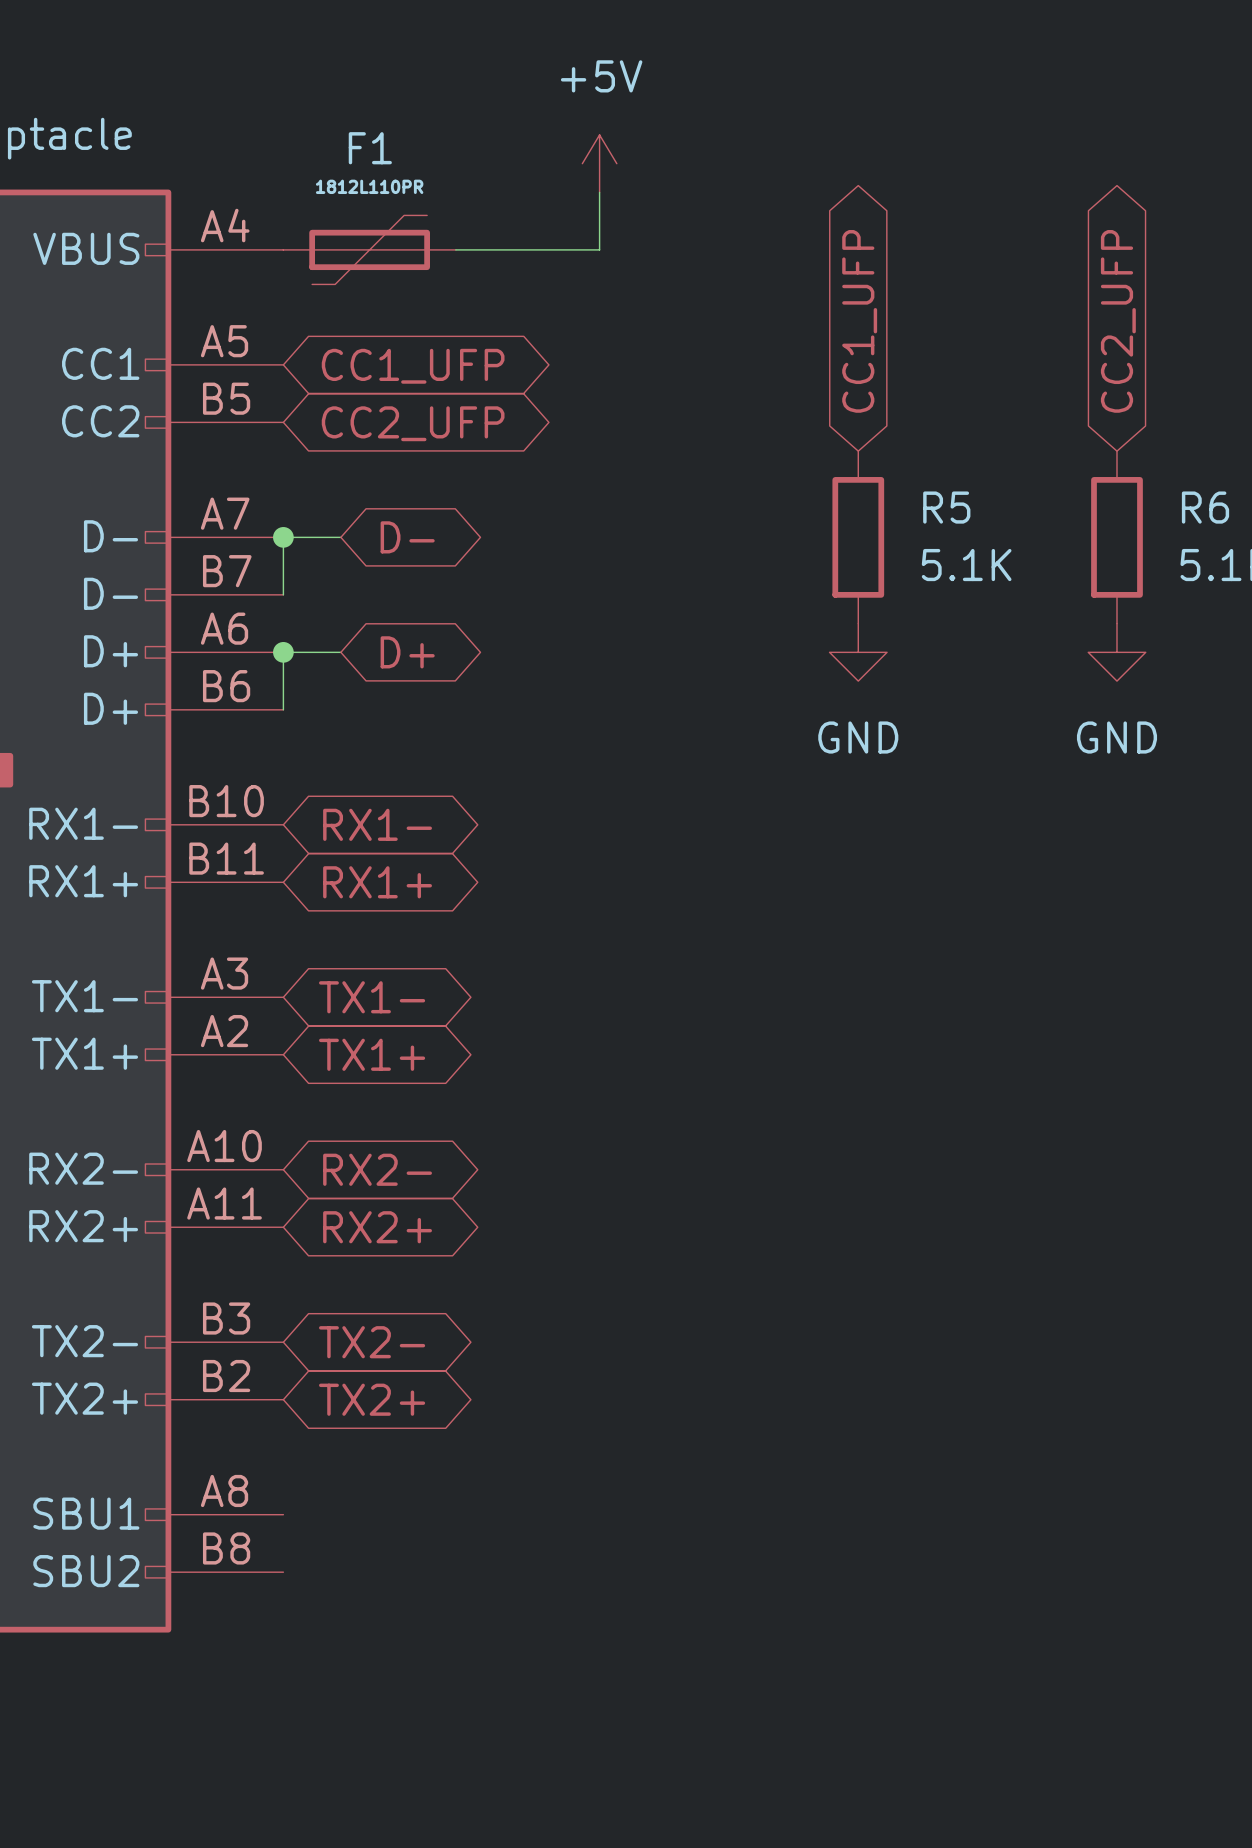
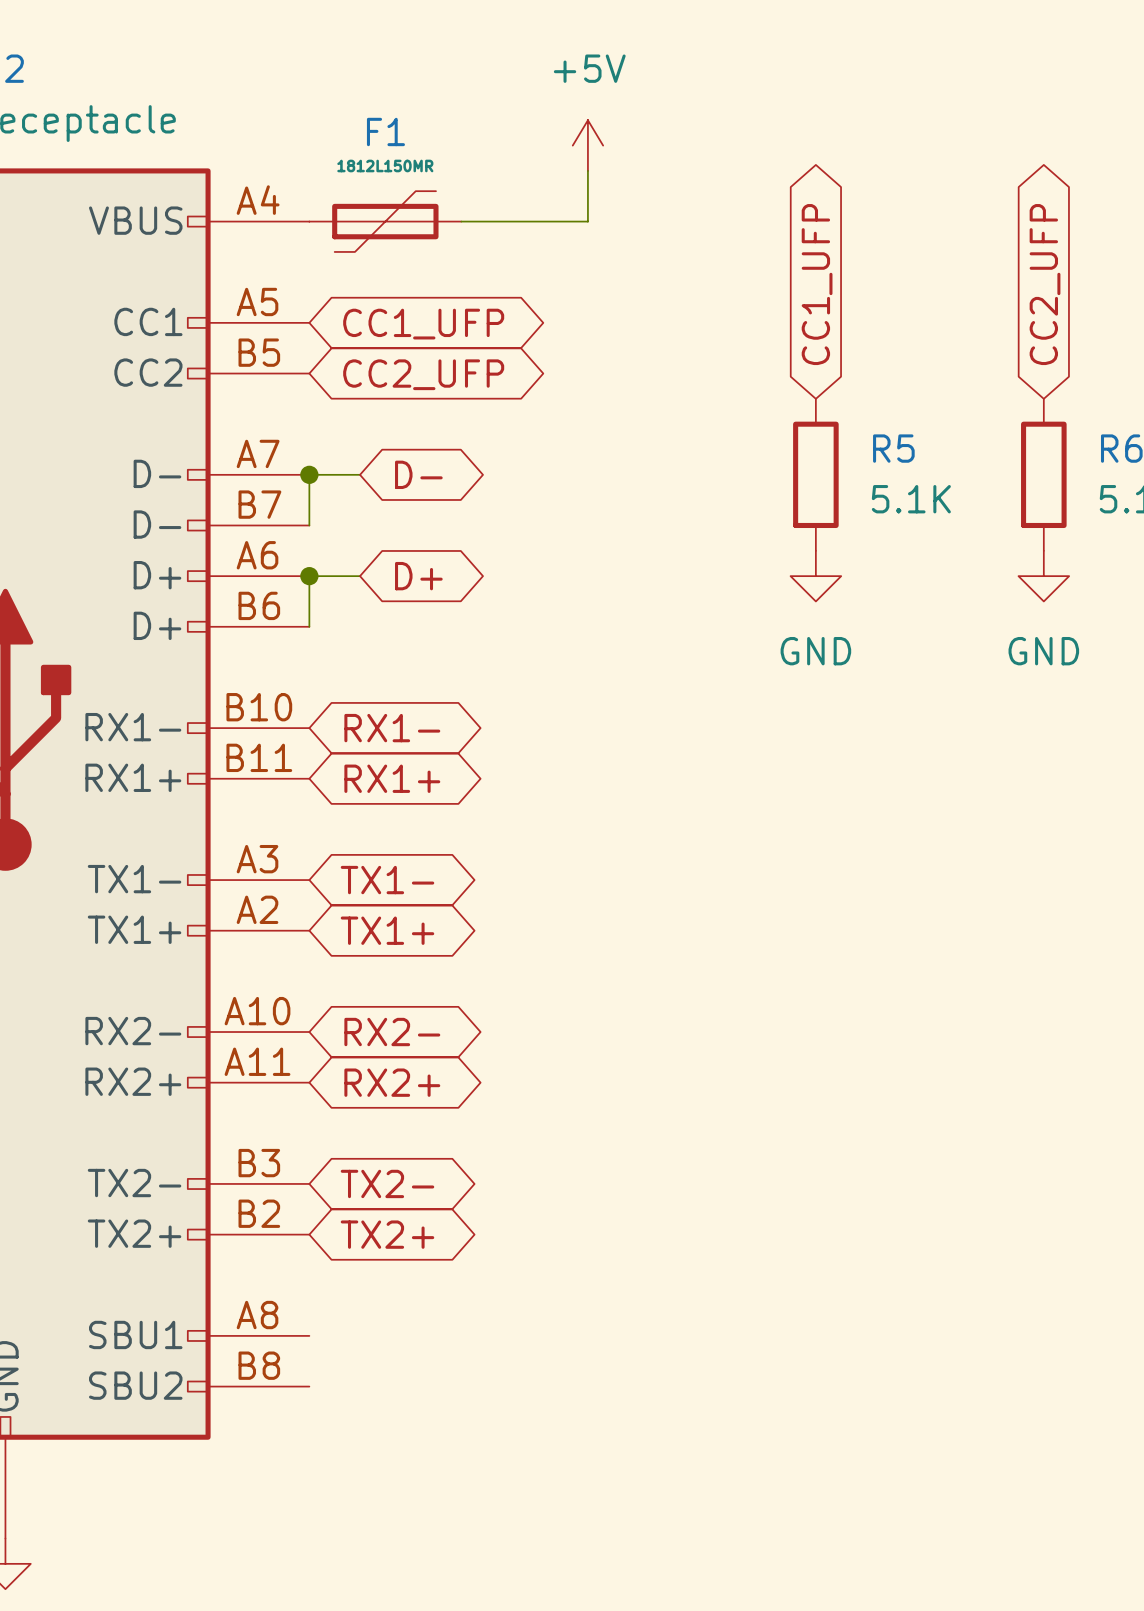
F1 value: 1812L110PR (369, 186) -> 1812L150MR (385, 165)

